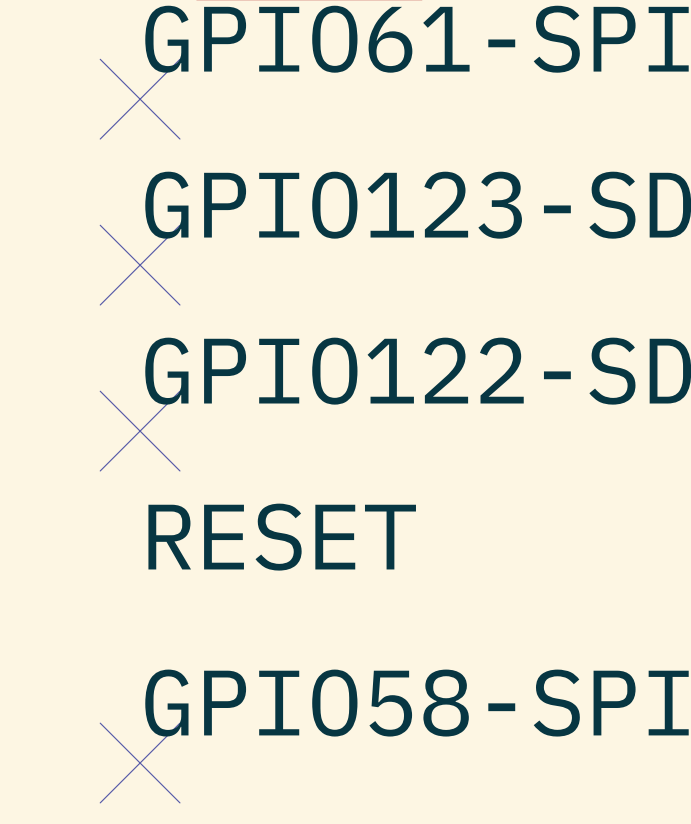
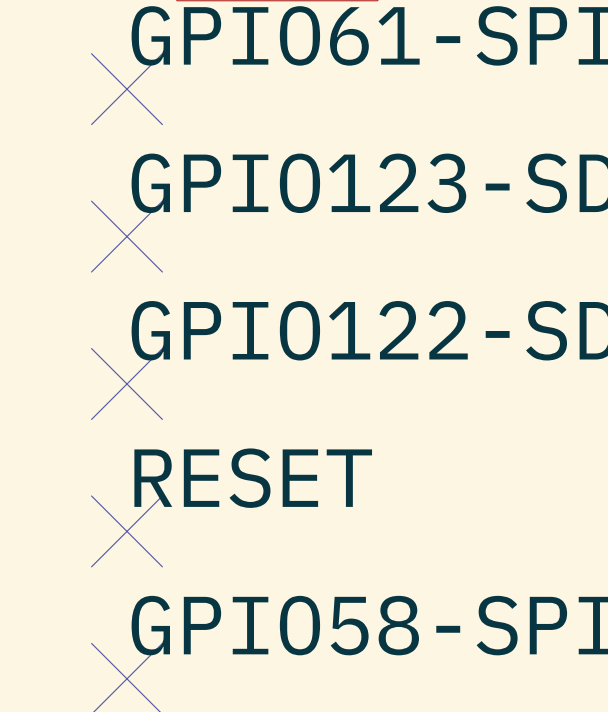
no-connect mark: none -> (126, 531)

